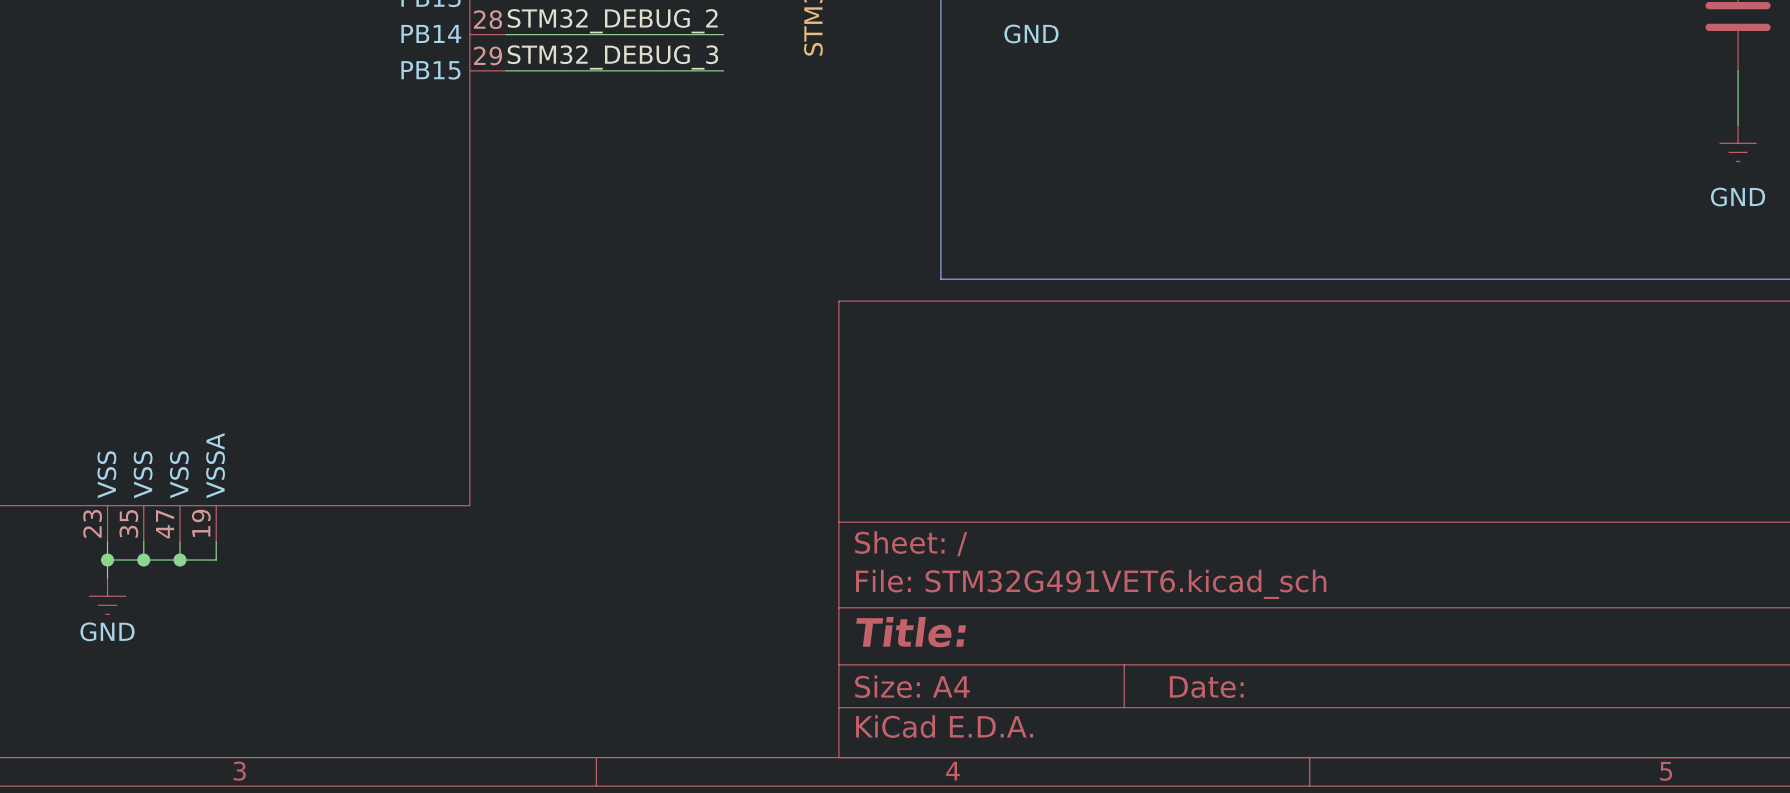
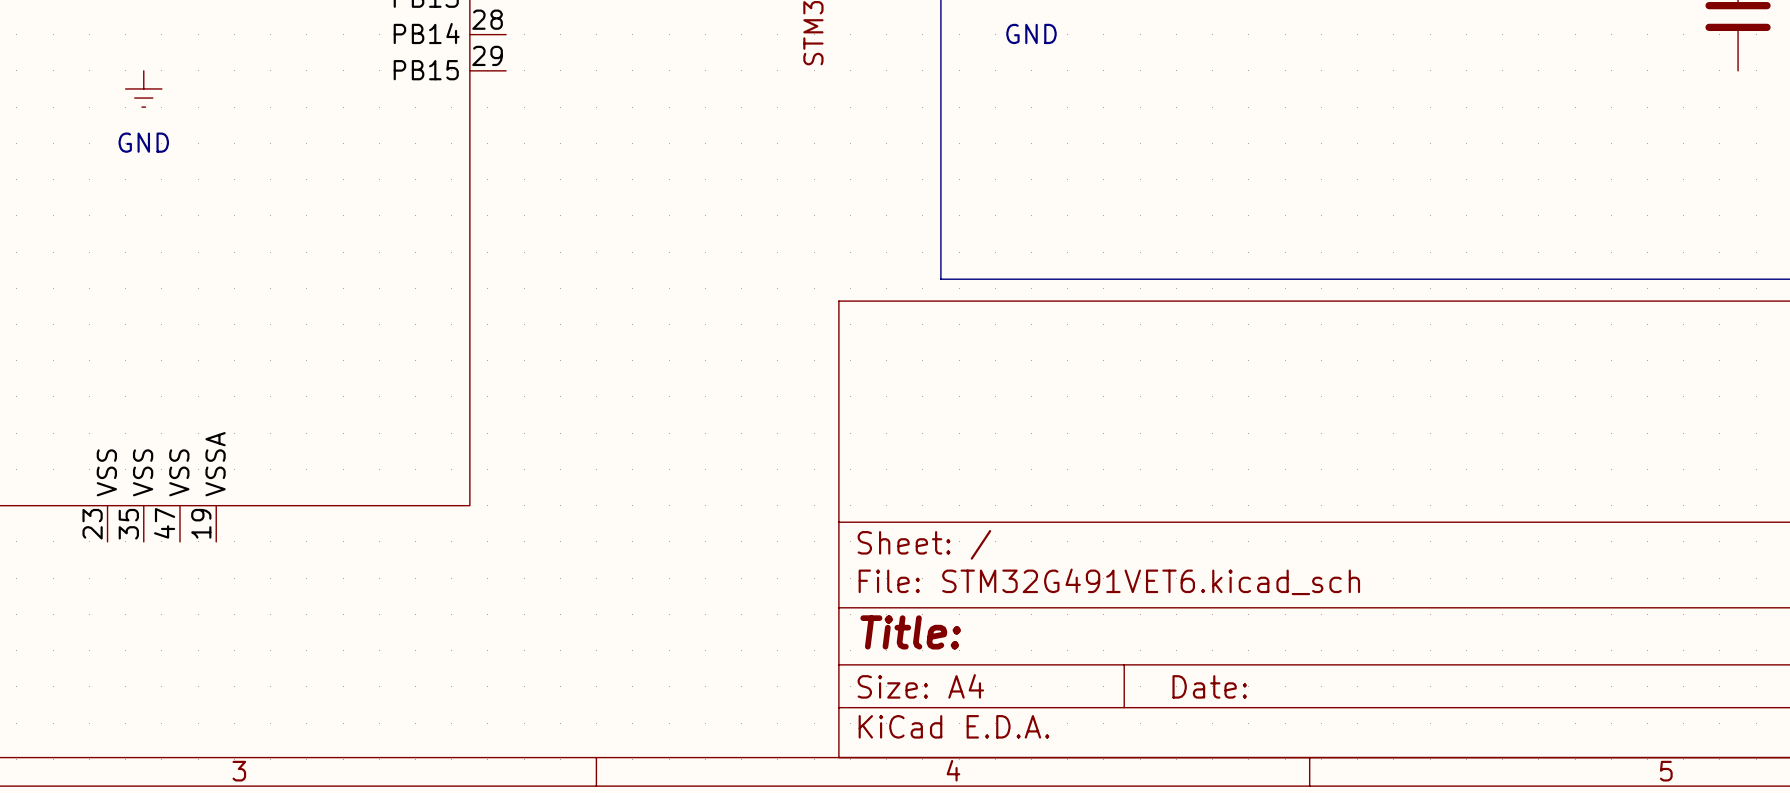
label: STM32_DEBUG_2 (612, 21) -> none
wire: (506, 34) (723, 34) -> none
label: STM32_DEBUG_3 (612, 57) -> none
wire: (506, 70) (723, 70) -> none
wire: (1738, 70) (1738, 125) -> none
power symbol: none -> GND (143, 88)
power symbol: GND (1738, 143) -> none
wire: (107, 541) (107, 578) -> none
wire: (143, 541) (143, 560) -> none
wire: (180, 541) (180, 560) -> none
wire: (216, 541) (216, 560) (107, 560) -> none
junction: (107, 560) -> none
junction: (143, 560) -> none
junction: (180, 560) -> none
power symbol: GND (107, 596) -> none

